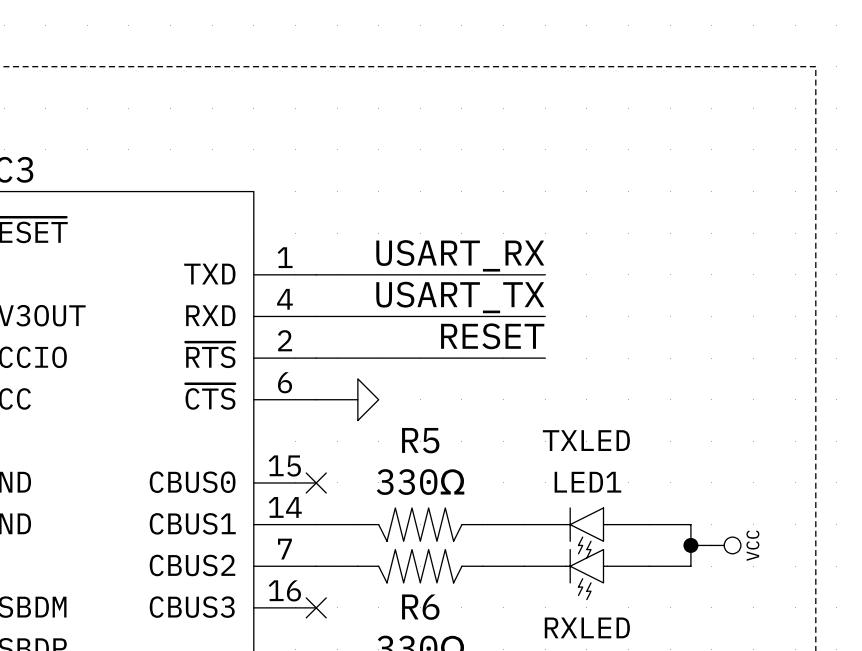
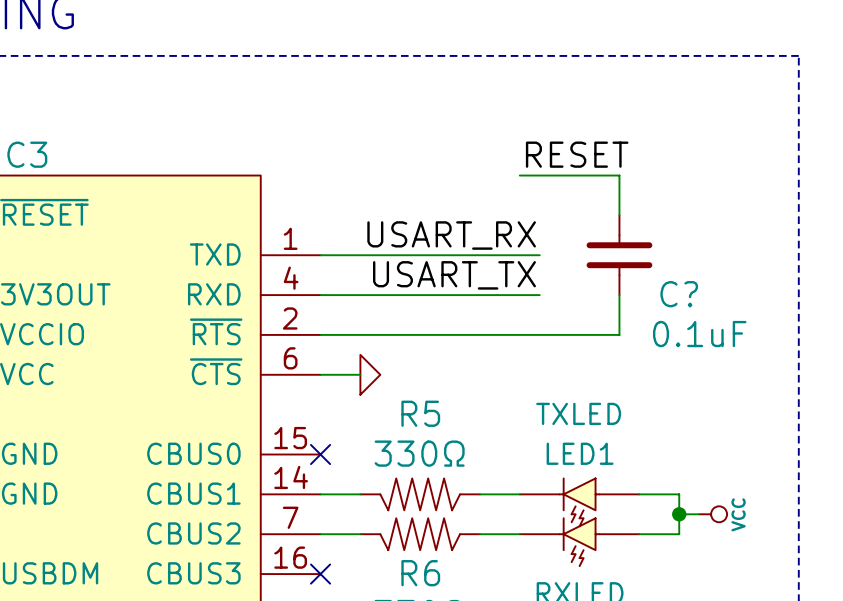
wire: none -> (519, 175) (619, 175) (619, 215)
C?: none -> 0.1uF (619, 255)
wire: none -> (619, 295) (619, 334) (539, 334)
label position: RESET (492, 336) -> RESET (577, 154)

